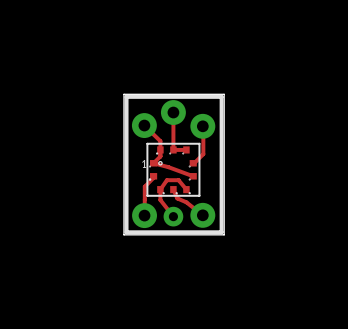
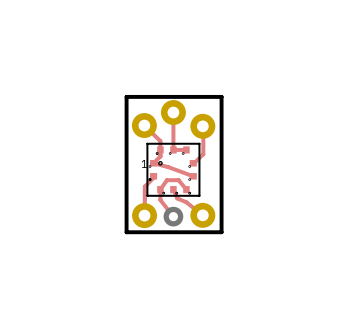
board edge: (123, 94) (224, 94) (224, 234) (123, 234) (123, 94) -> none

